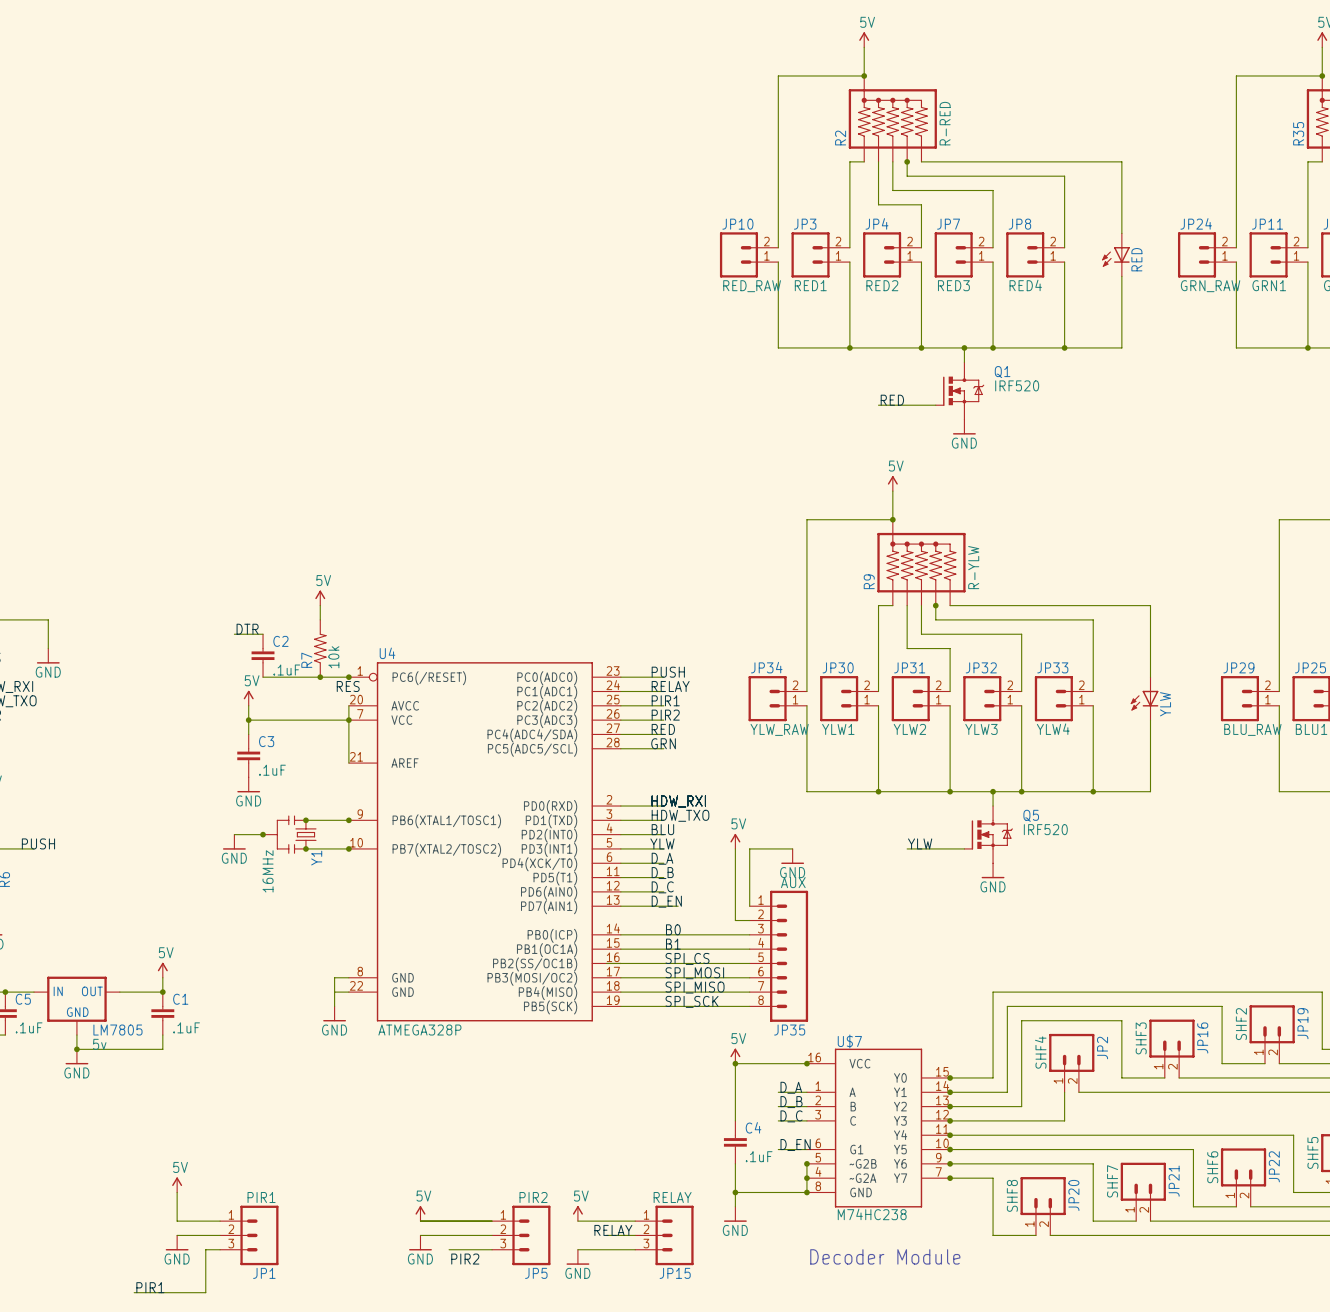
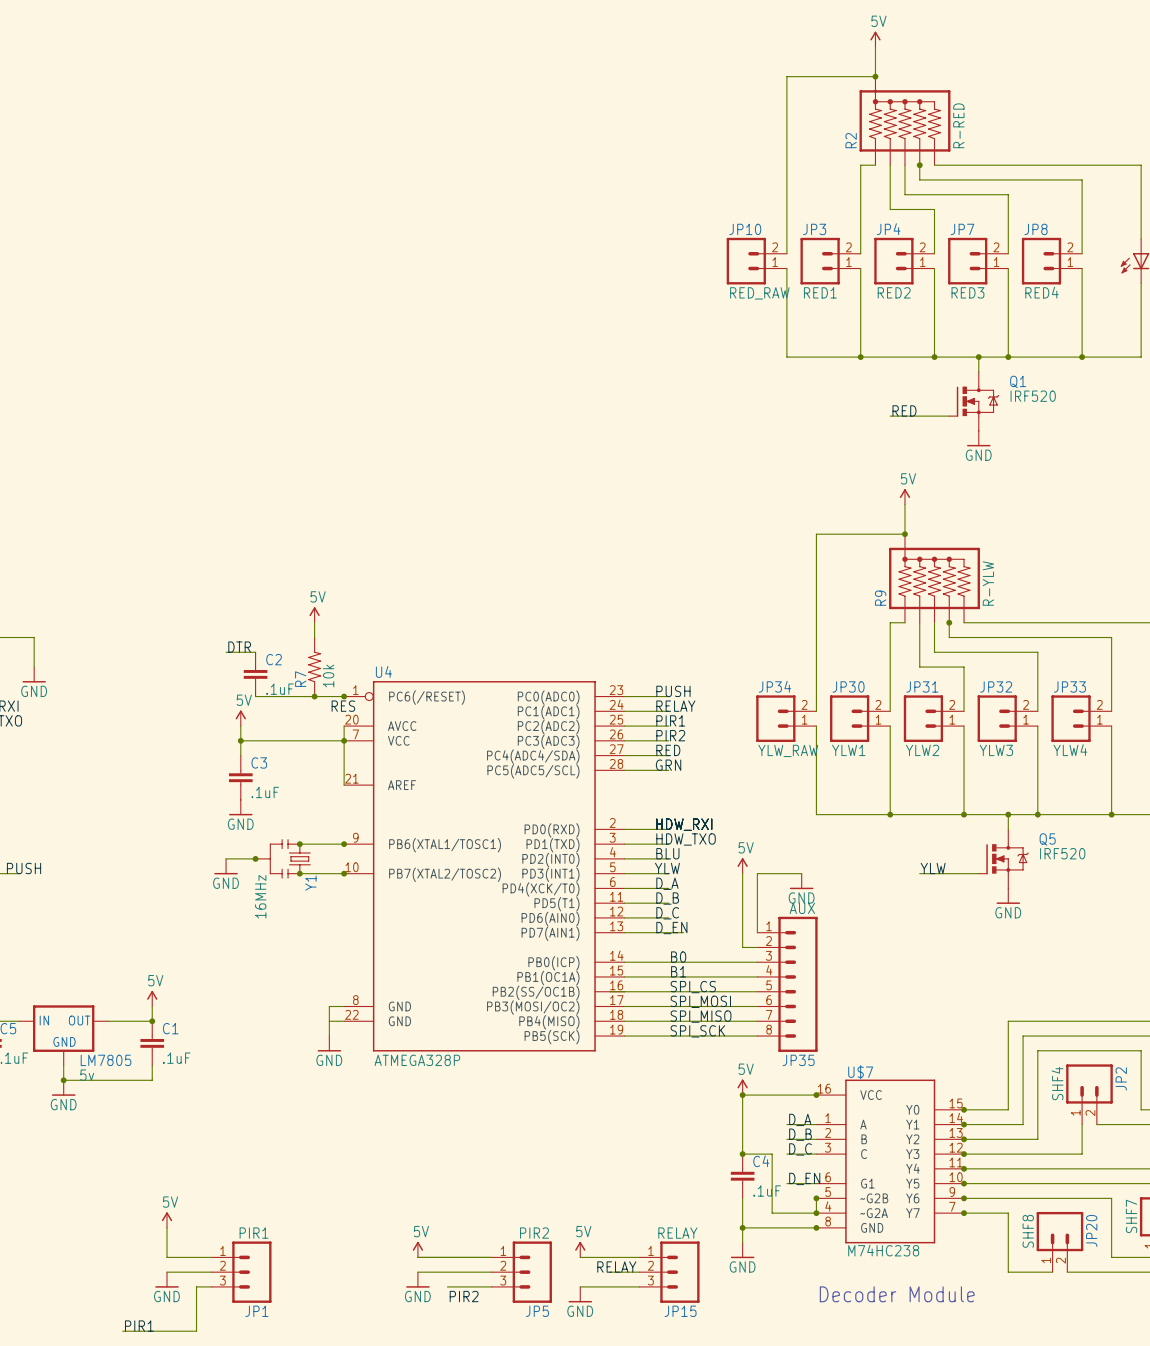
junction: none -> (742, 1154)
wire: (806, 1178) (806, 1192) -> (816, 1213) (772, 1213) (772, 1154) (742, 1154)

